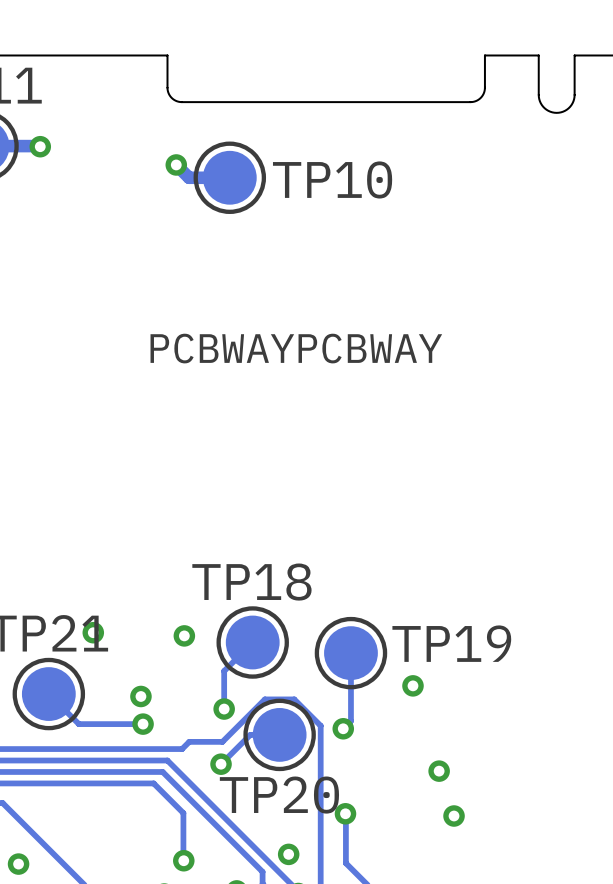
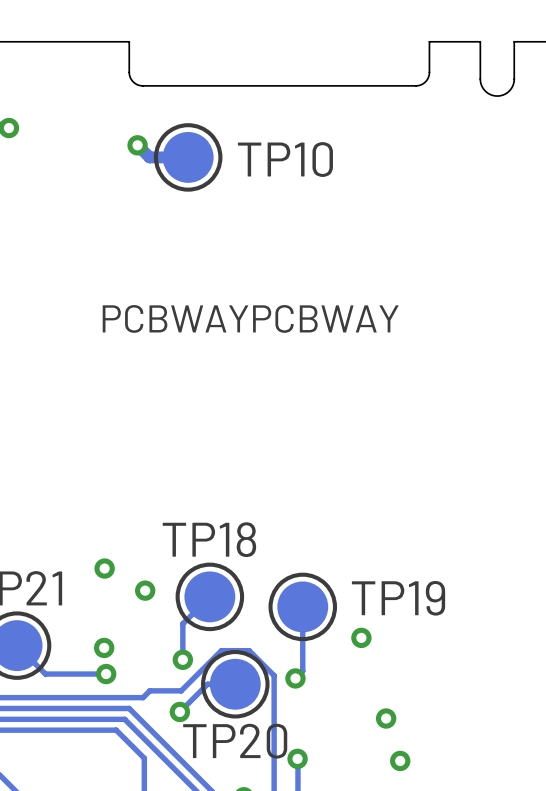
via position: (93, 632) -> (104, 568)

